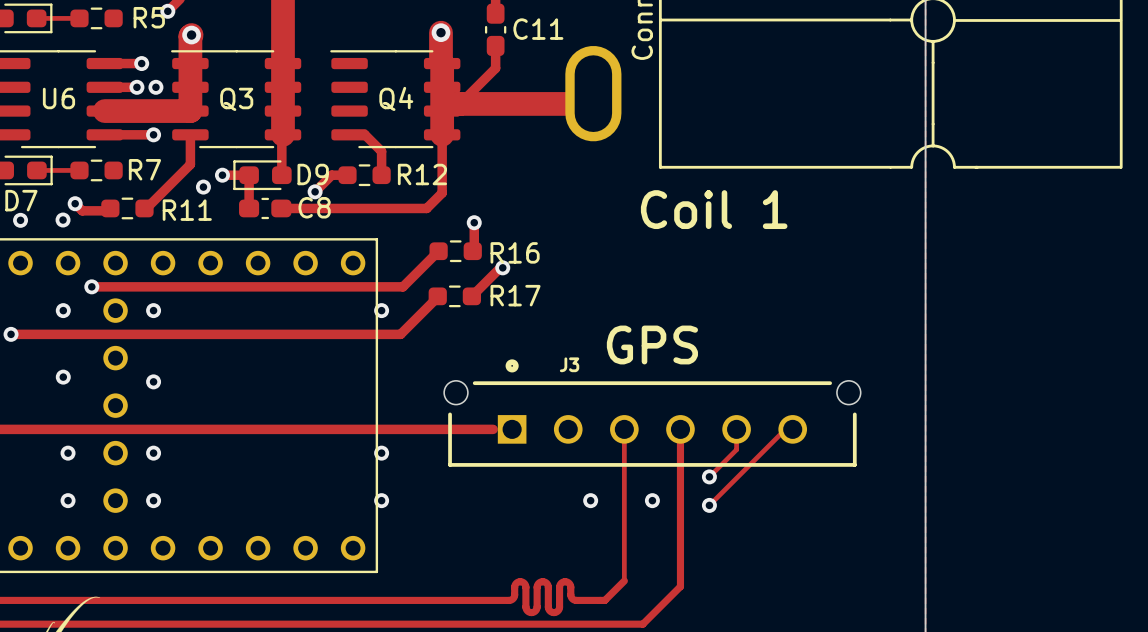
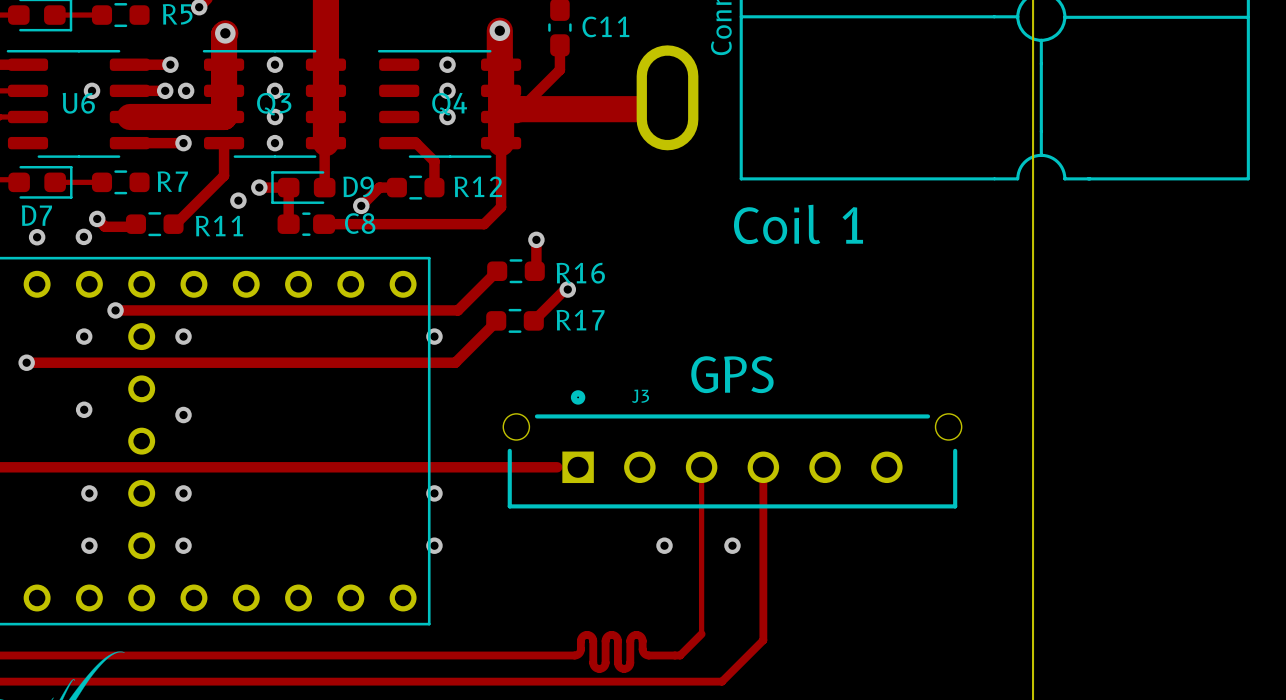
via: none -> (275, 64)
via: none -> (447, 64)
via: none -> (92, 90)
via: none -> (275, 90)
via: none -> (447, 90)
via: none -> (275, 116)
via: none -> (447, 116)
via: none -> (275, 143)
track: (736, 429) (736, 449) (709, 476) -> none
track: (785, 429) (709, 505) -> none
via: (709, 476) -> none
via: (709, 505) -> none

